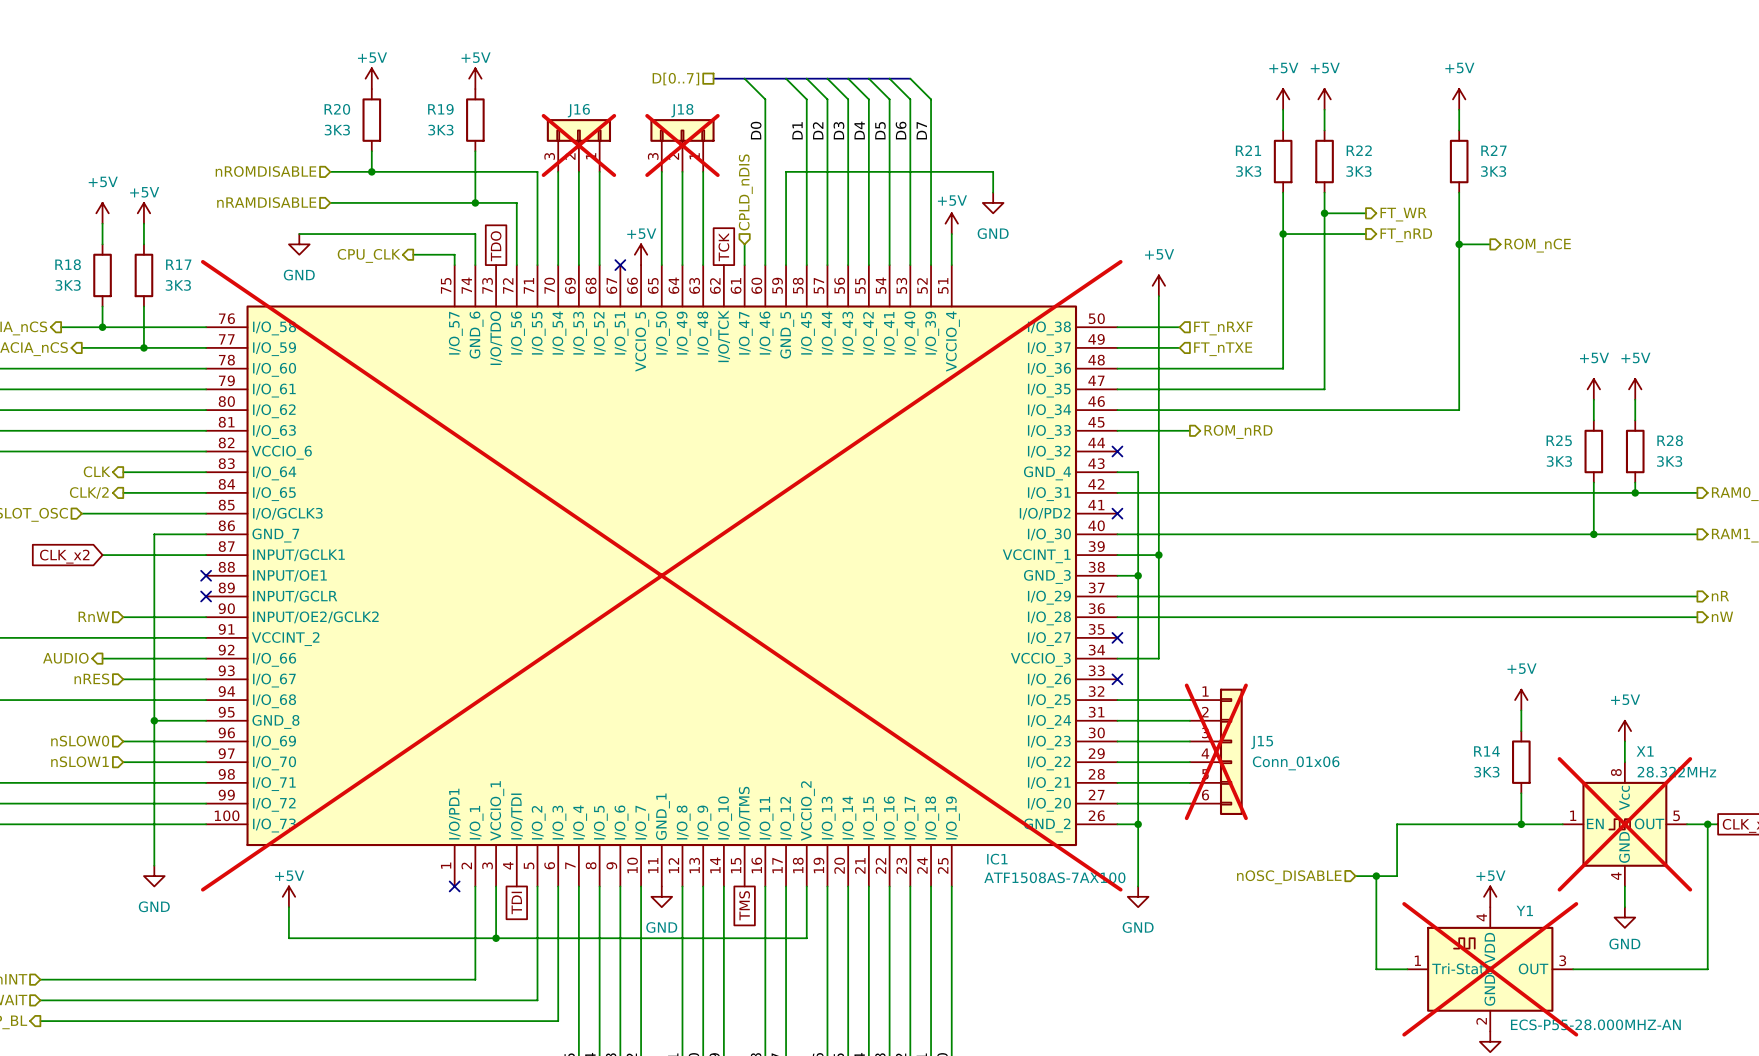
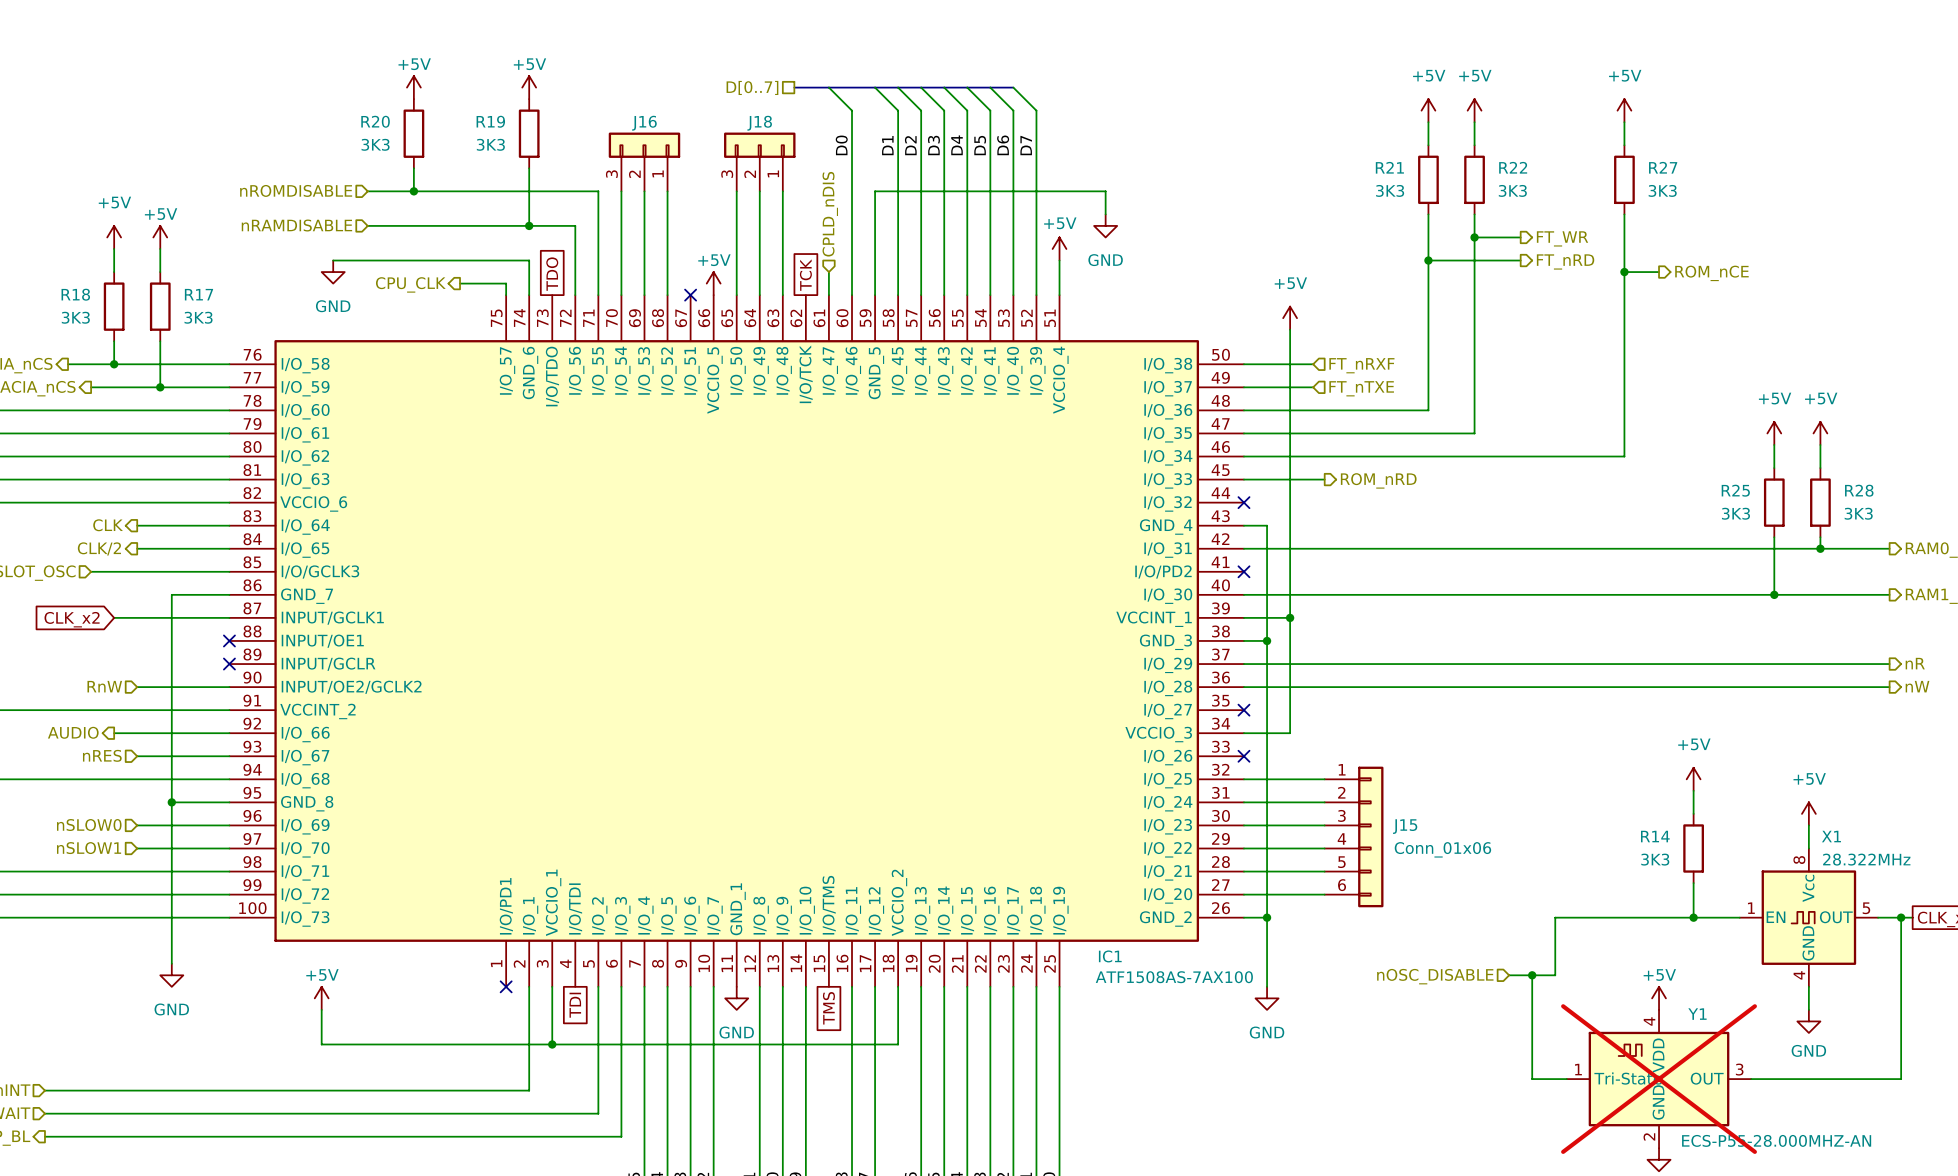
J16 do-not-place cross: (578, 145) -> none
J18 do-not-place cross: (682, 145) -> none
IC1 do-not-place cross: (661, 575) -> none
J15 do-not-place cross: (1216, 751) -> none
X1 do-not-place cross: (1624, 824) -> none

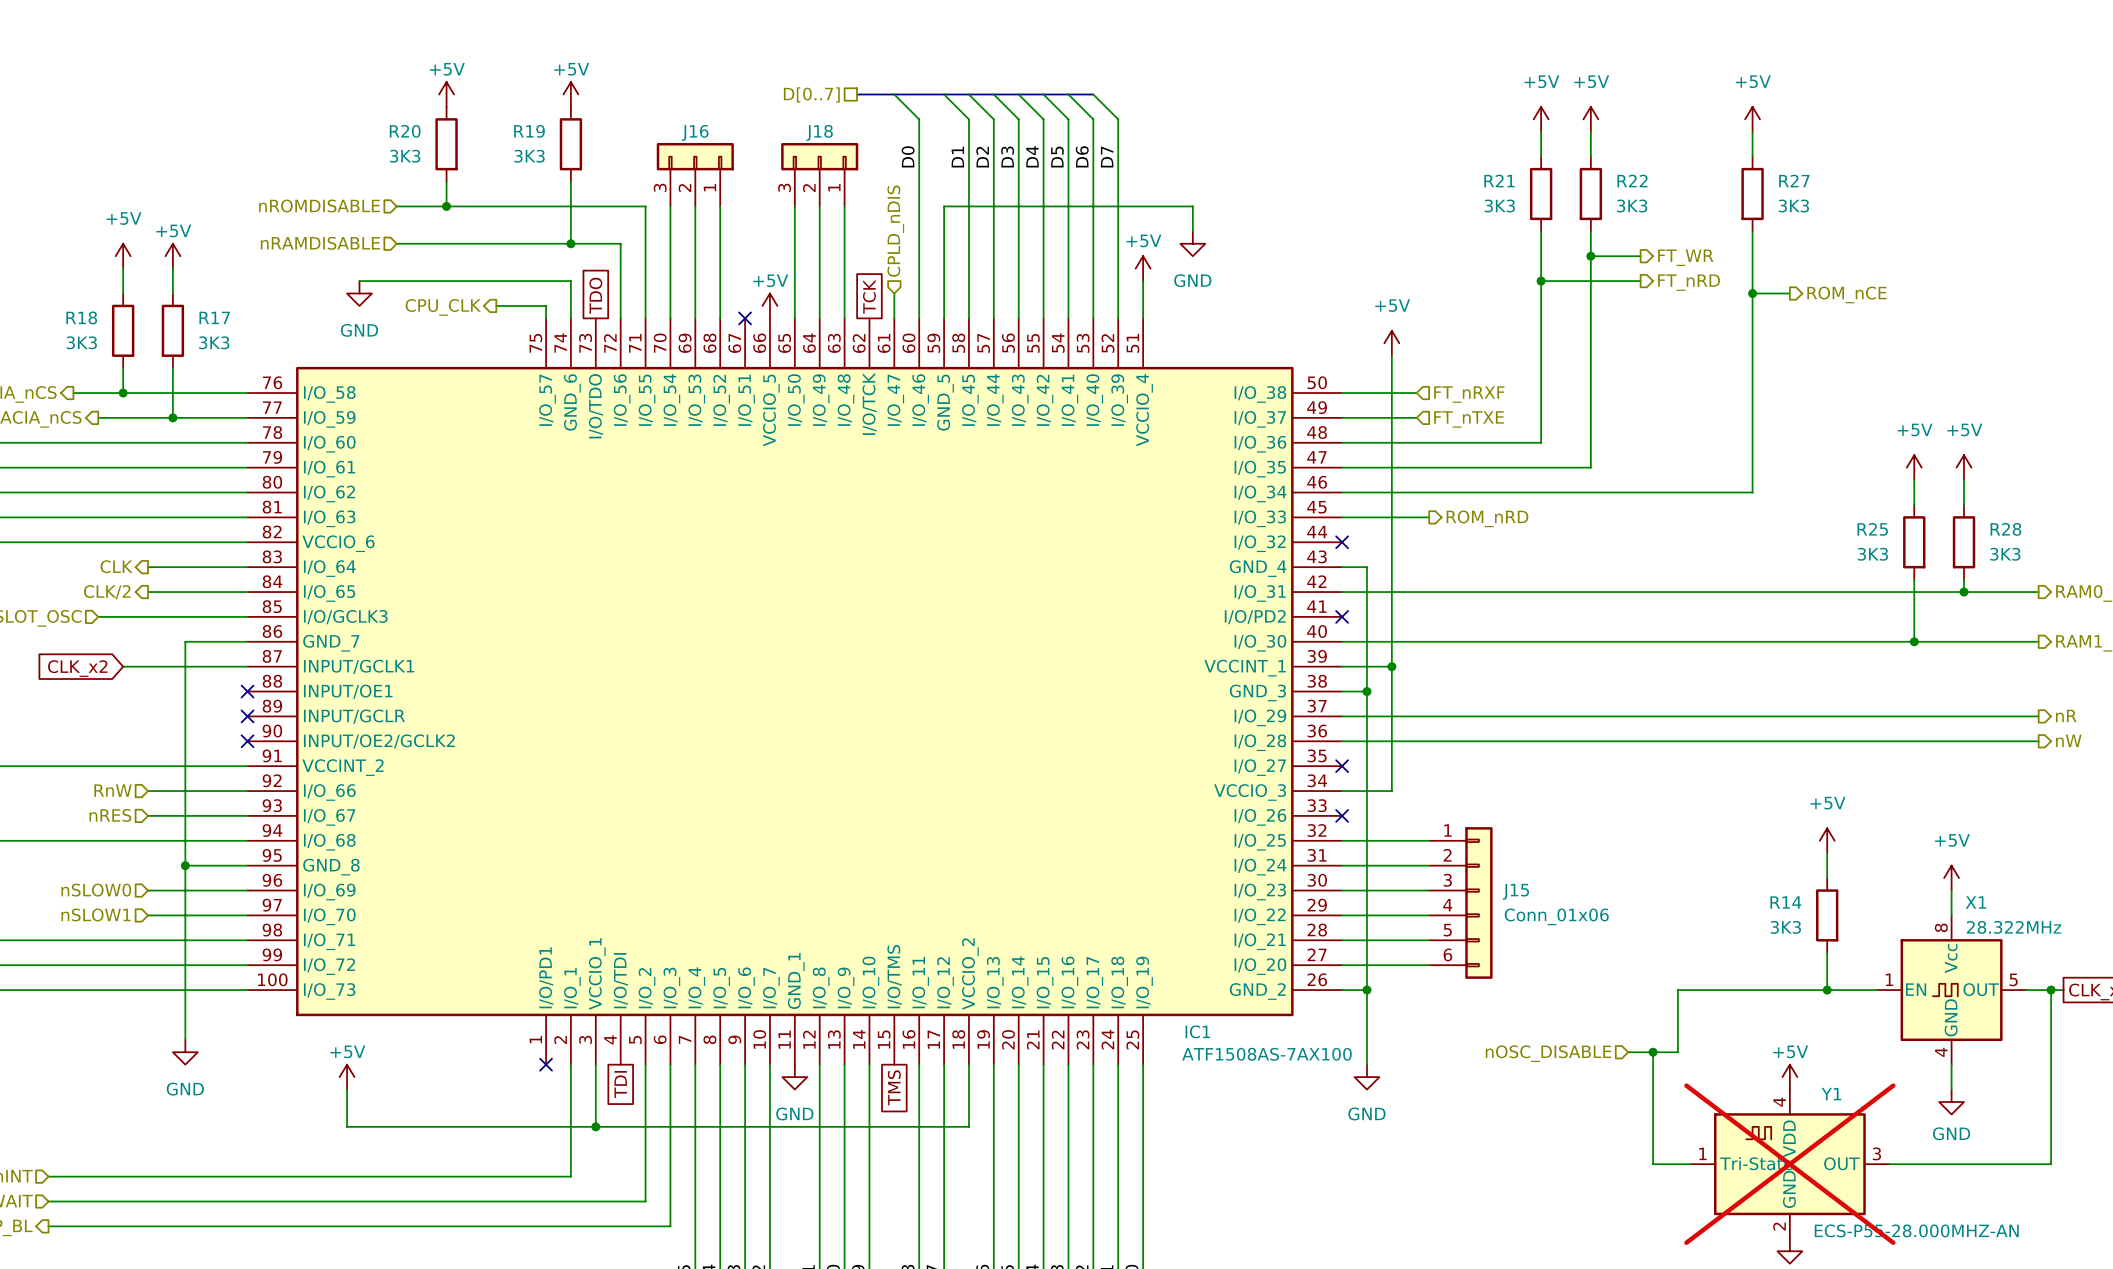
hierarchical label position: RnW (104, 686) -> RnW (113, 790)
wire: (137, 687) (229, 687) -> none
no-connect mark: none -> (247, 741)
hierarchical label: AUDIO (73, 732) -> none
wire: (114, 733) (137, 733) -> none

